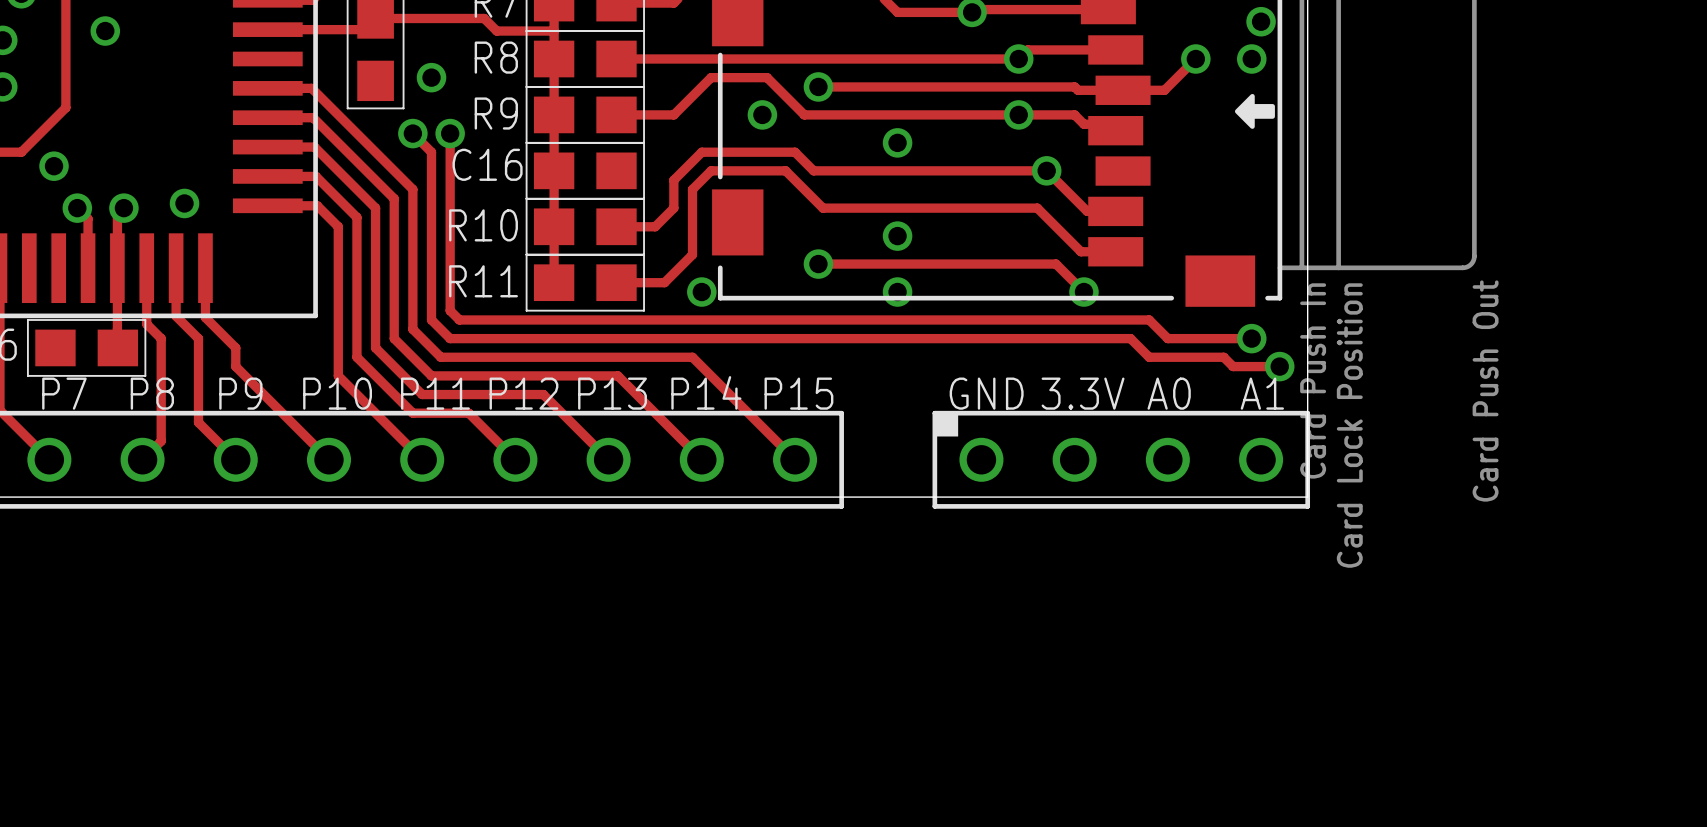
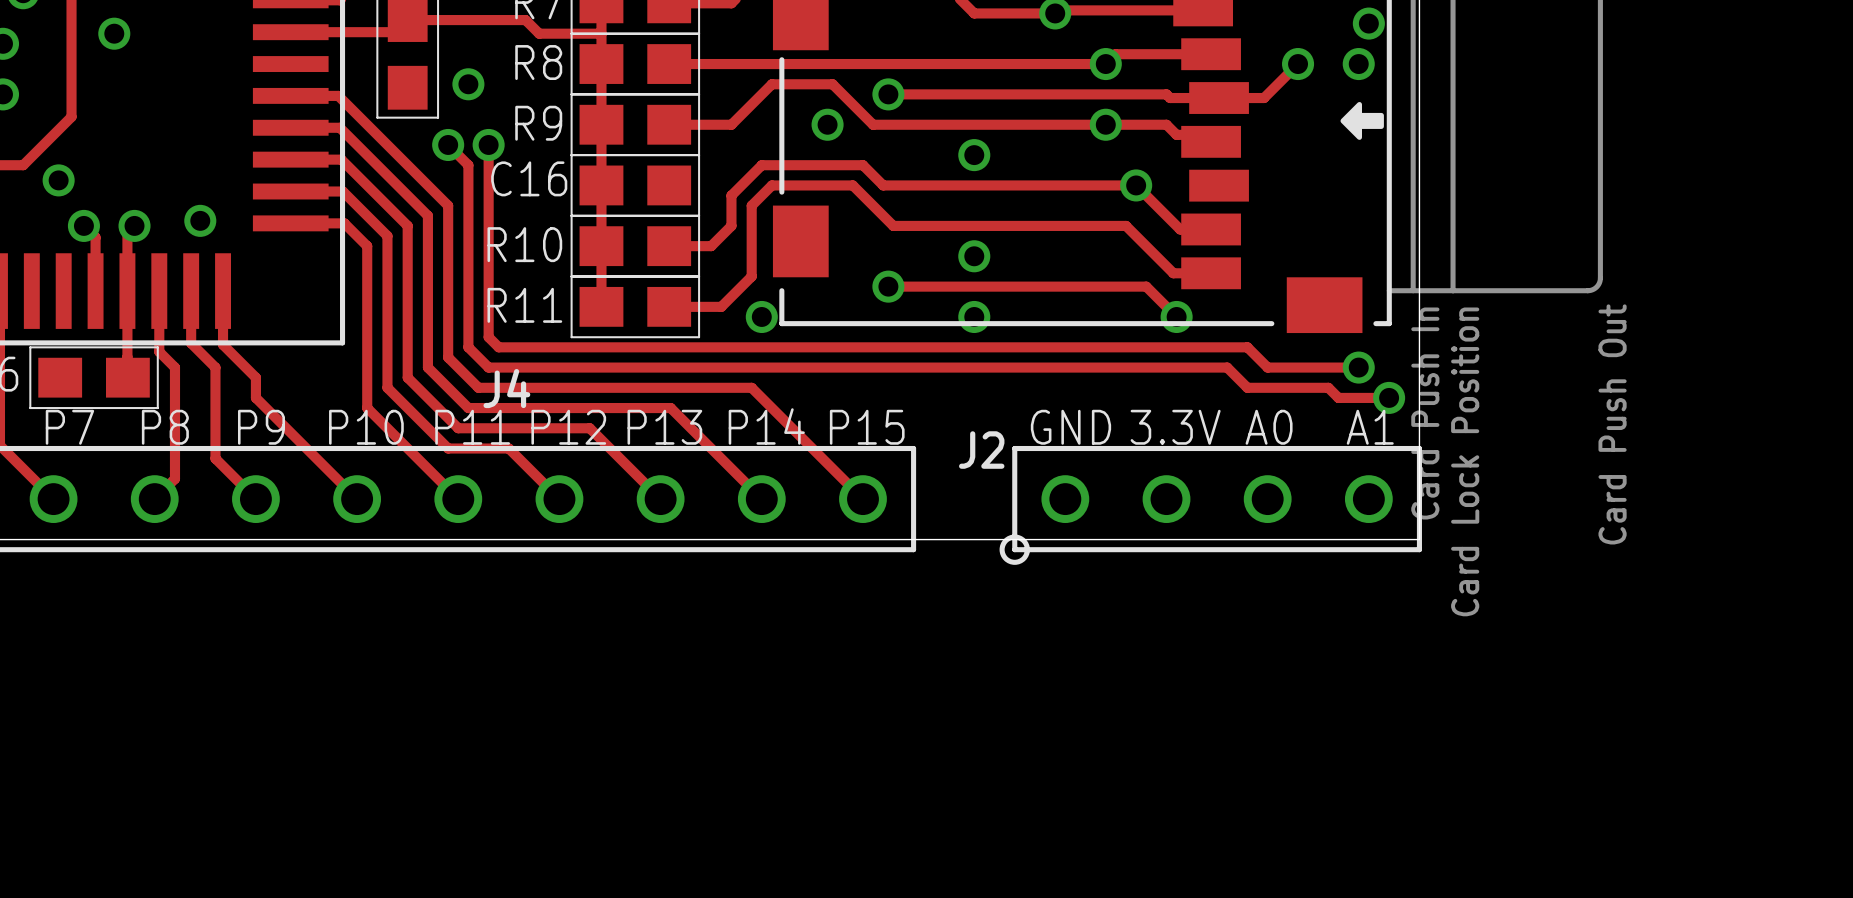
J4 name: none -> J4 (506, 388)
part: (1121, 459) -> none
J2: none -> (1210, 505)

